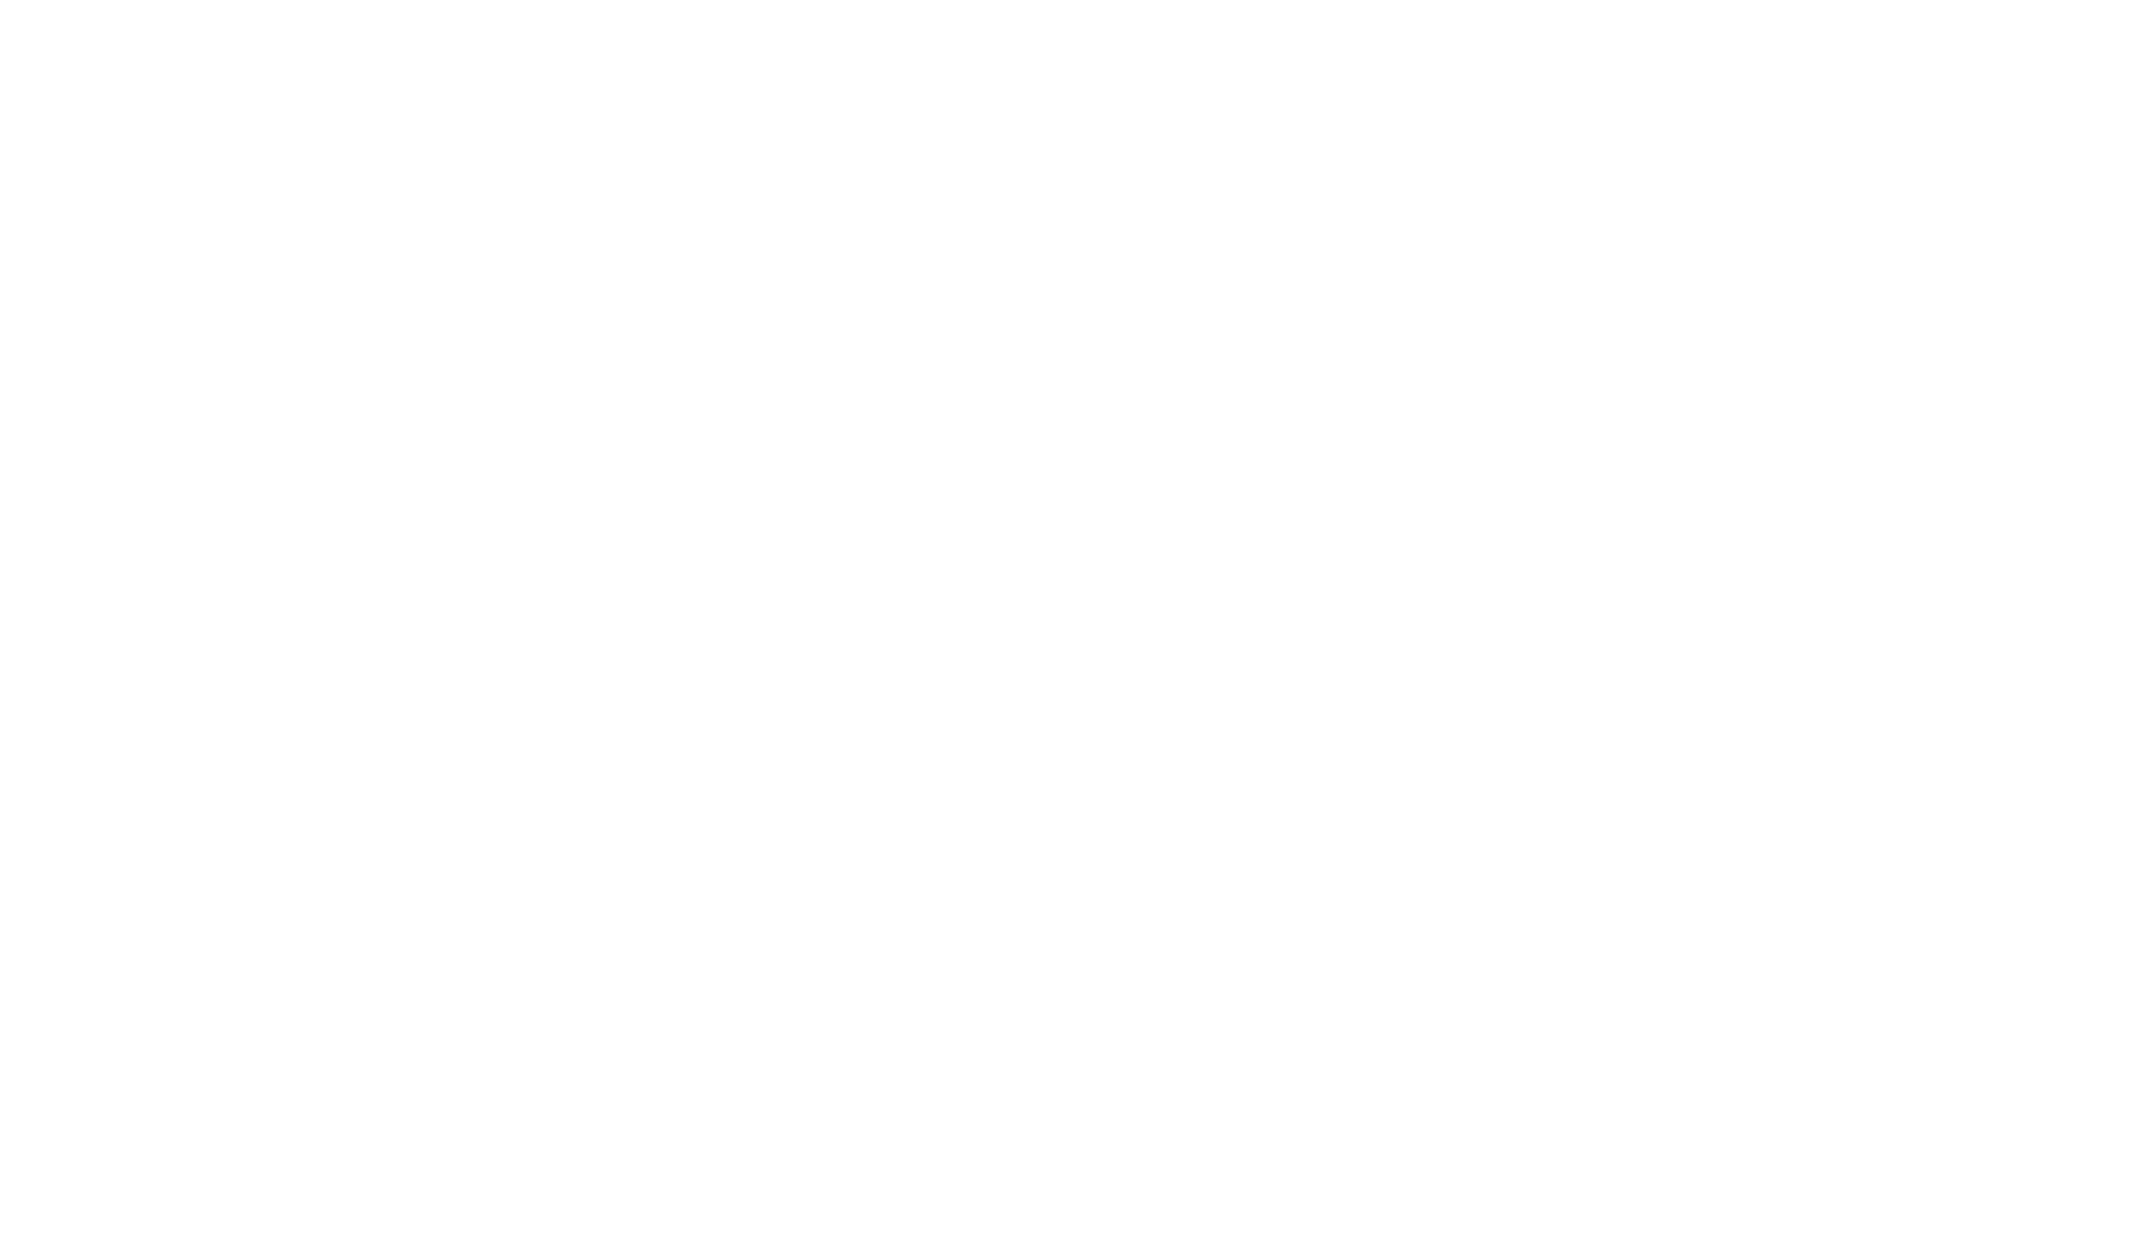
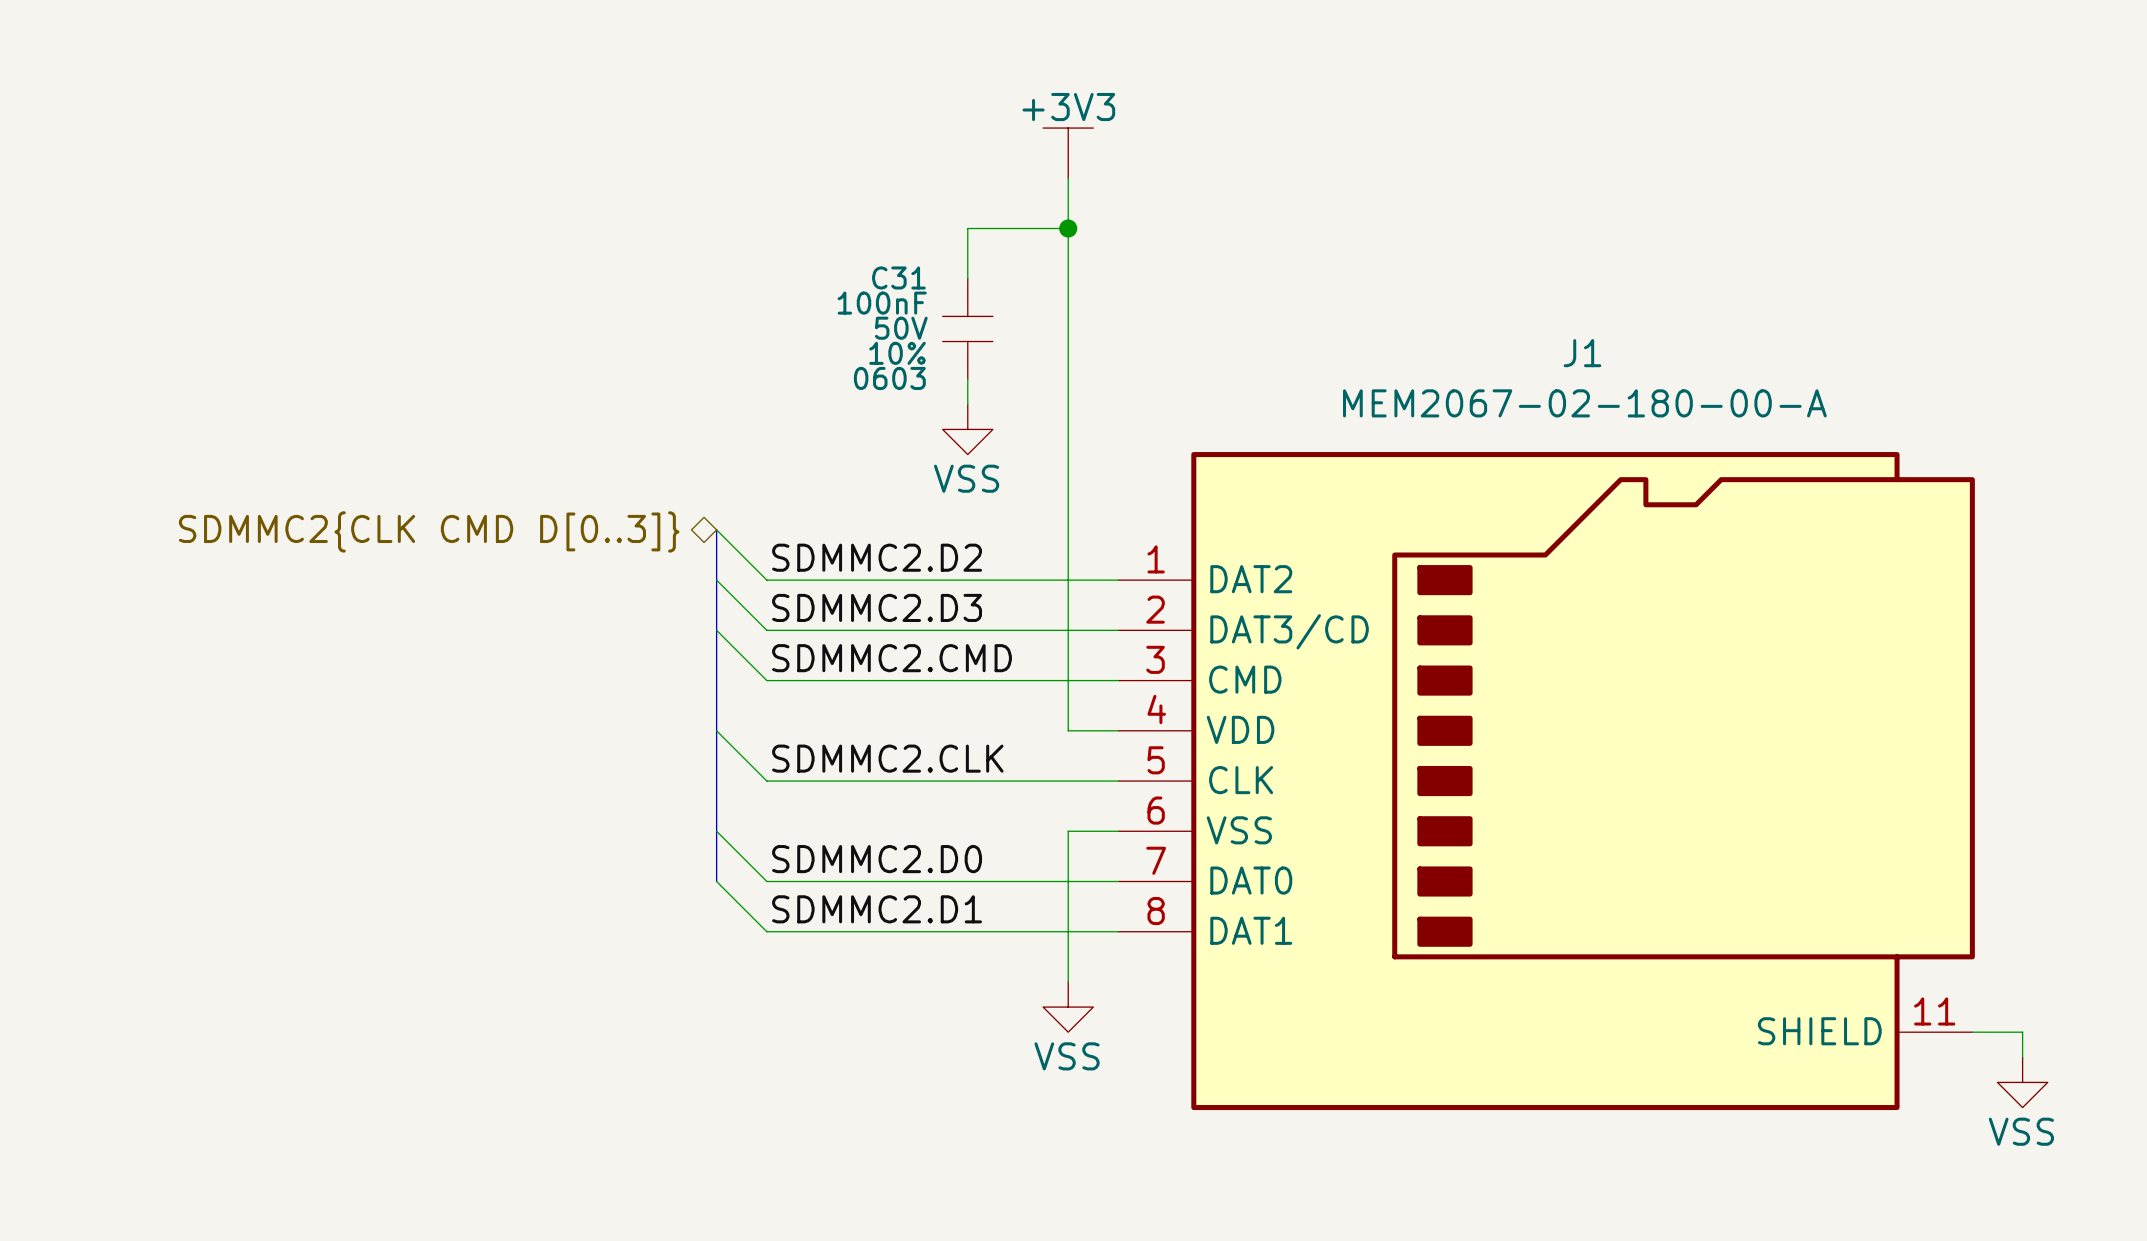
power symbol: none -> +3V3 (1068, 153)
wire: none -> (1068, 178) (1068, 730) (1118, 730)
wire: none -> (1068, 228) (967, 228) (967, 278)
junction: none -> (1068, 228)
C31: none -> 100nF (967, 328)
wire: none -> (967, 379) (967, 404)
power symbol: none -> VSS (967, 429)
wire: none -> (716, 529) (766, 580) (1118, 580)
bus: none -> (716, 529) (716, 881)
hierarchical label: none -> SDMMC2{CLK CMD D[0..3]} (429, 531)
label: none -> SDMMC2.D2 (877, 557)
wire: none -> (716, 580) (766, 630) (1118, 630)
label: none -> SDMMC2.D3 (877, 607)
wire: none -> (716, 630) (766, 680) (1118, 680)
label: none -> SDMMC2.CMD (892, 658)
wire: none -> (716, 730) (766, 781) (1118, 781)
label: none -> SDMMC2.CLK (887, 758)
J1: none -> MEM2067-02-180-00-A (1546, 781)
wire: none -> (716, 831) (766, 881) (1118, 881)
wire: none -> (1118, 831) (1068, 831) (1068, 981)
label: none -> SDMMC2.D0 (877, 859)
wire: none -> (716, 881) (766, 931) (1118, 931)
label: none -> SDMMC2.D1 (877, 909)
power symbol: none -> VSS (1068, 1007)
wire: none -> (1972, 1032) (2022, 1032) (2022, 1057)
power symbol: none -> VSS (2022, 1082)

